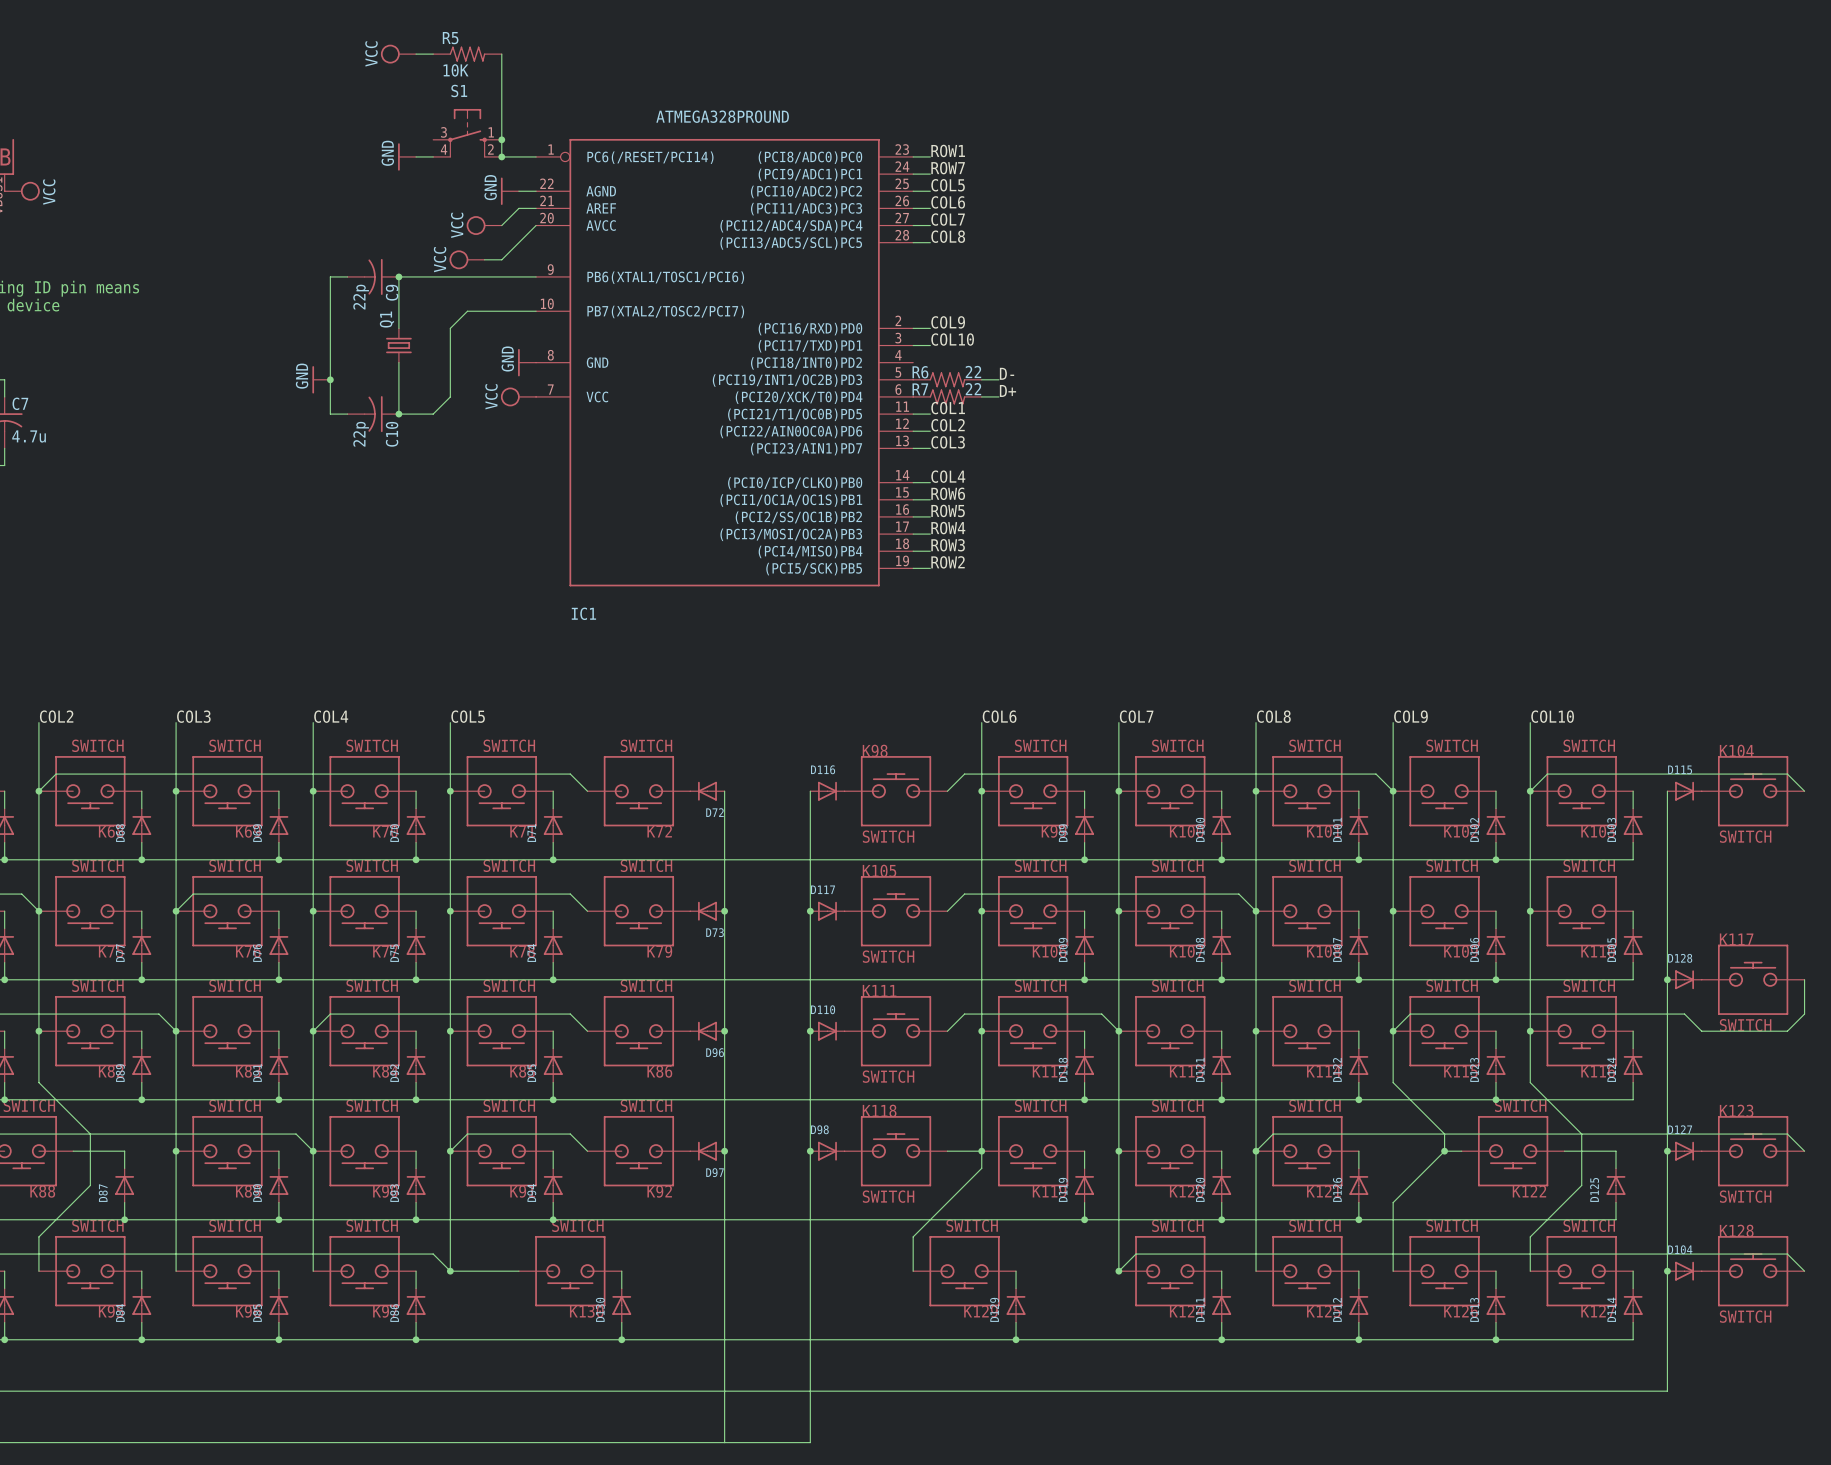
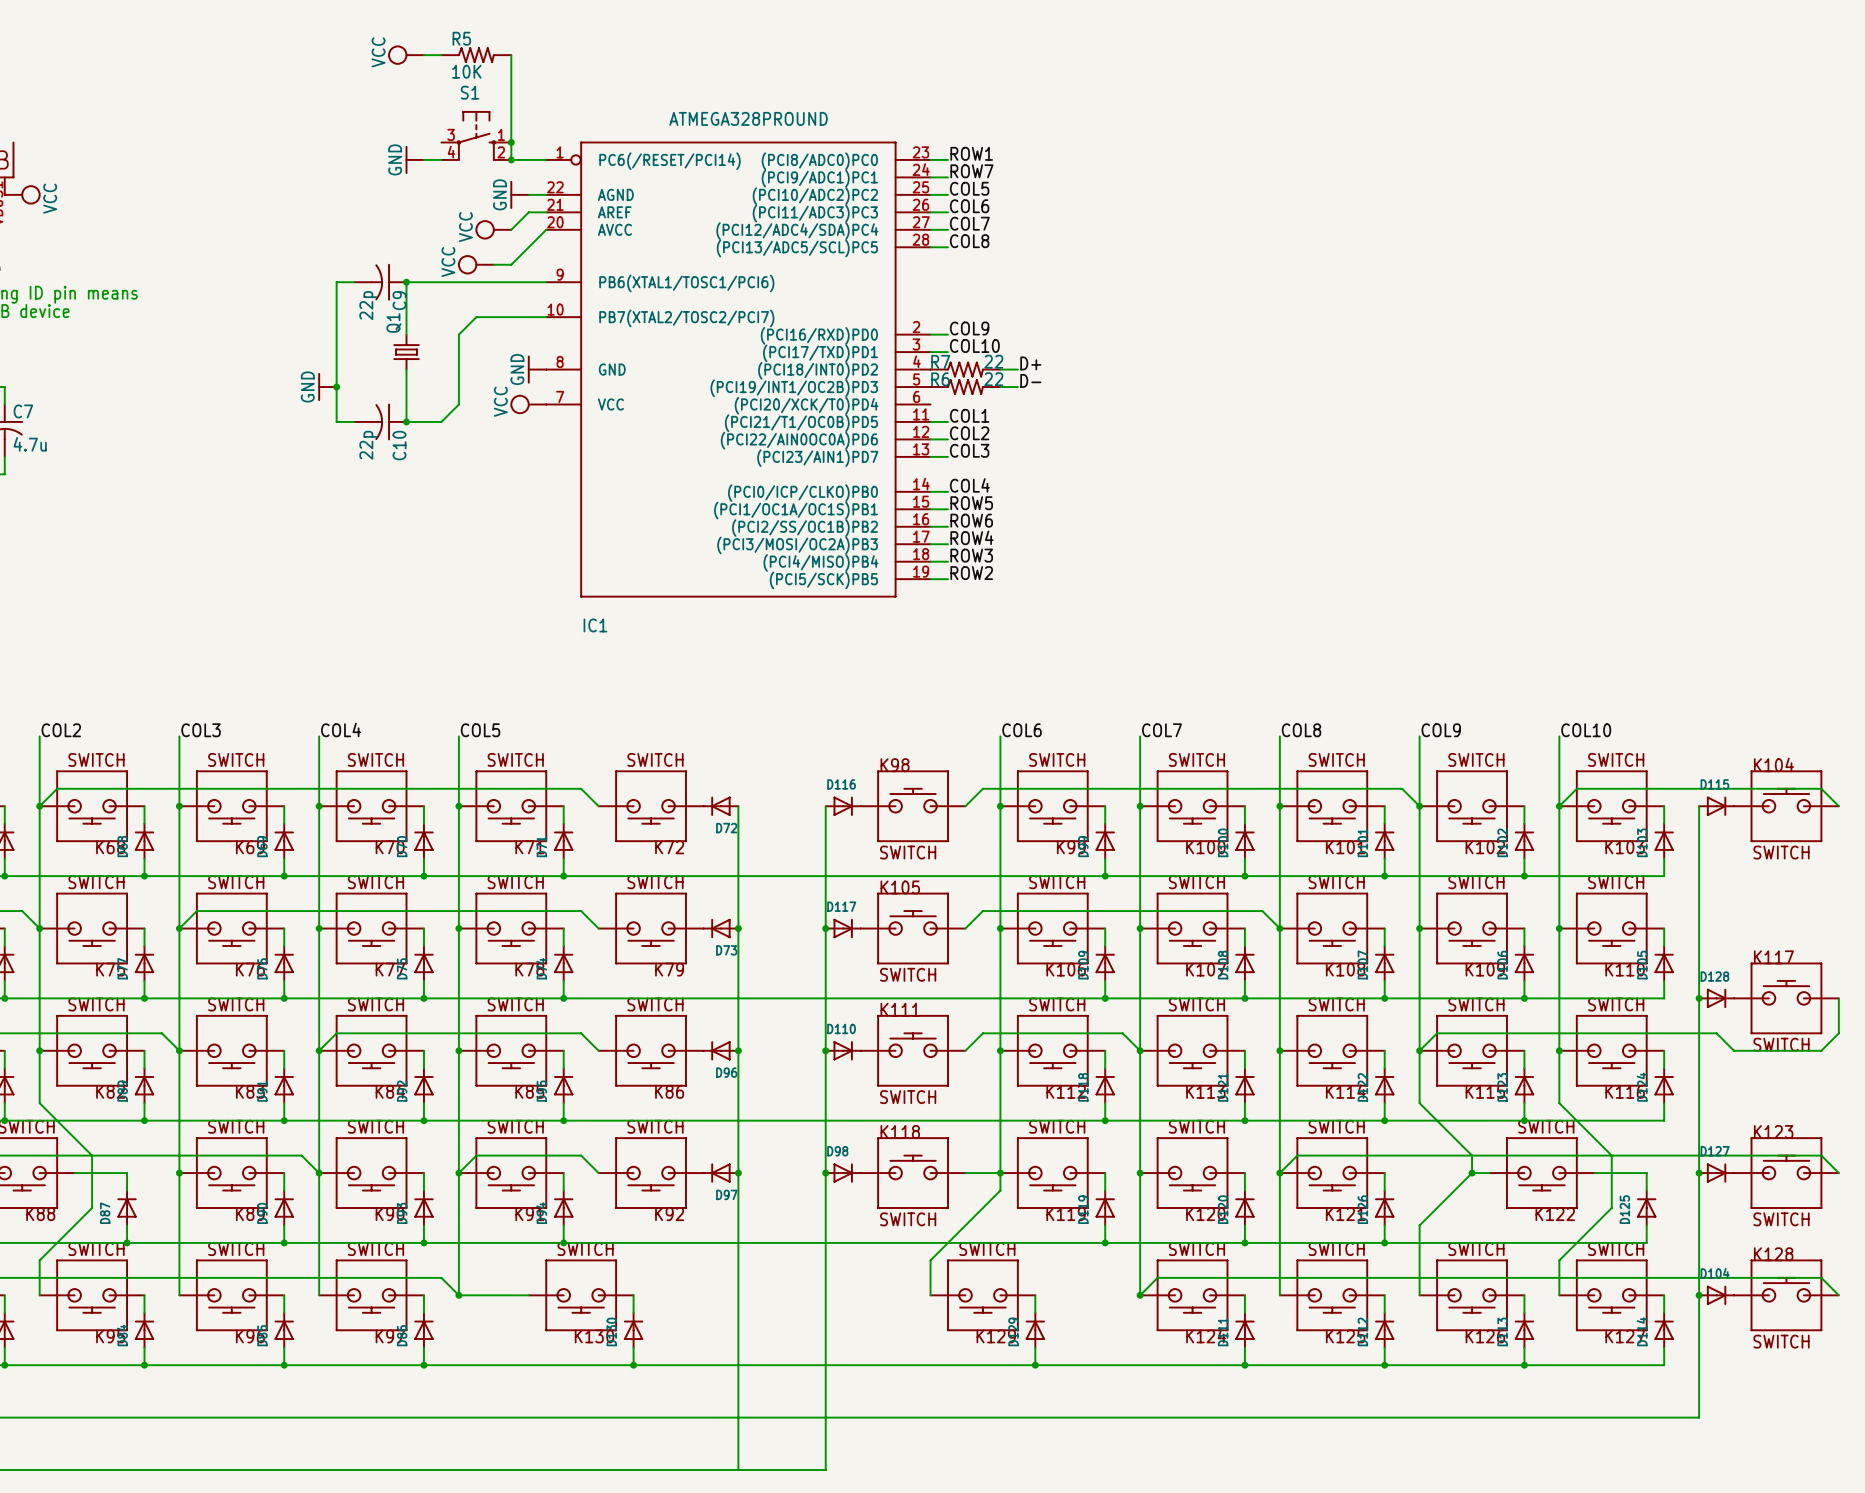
label position: D+ (1007, 390) -> D+ (1030, 363)
R7 position: (947, 396) -> (965, 369)
wire: (981, 396) (998, 396) -> (1000, 369) (1017, 369)
label: ROW6 (948, 493) -> ROW5 (971, 503)
label: ROW5 (948, 510) -> ROW6 (971, 520)

